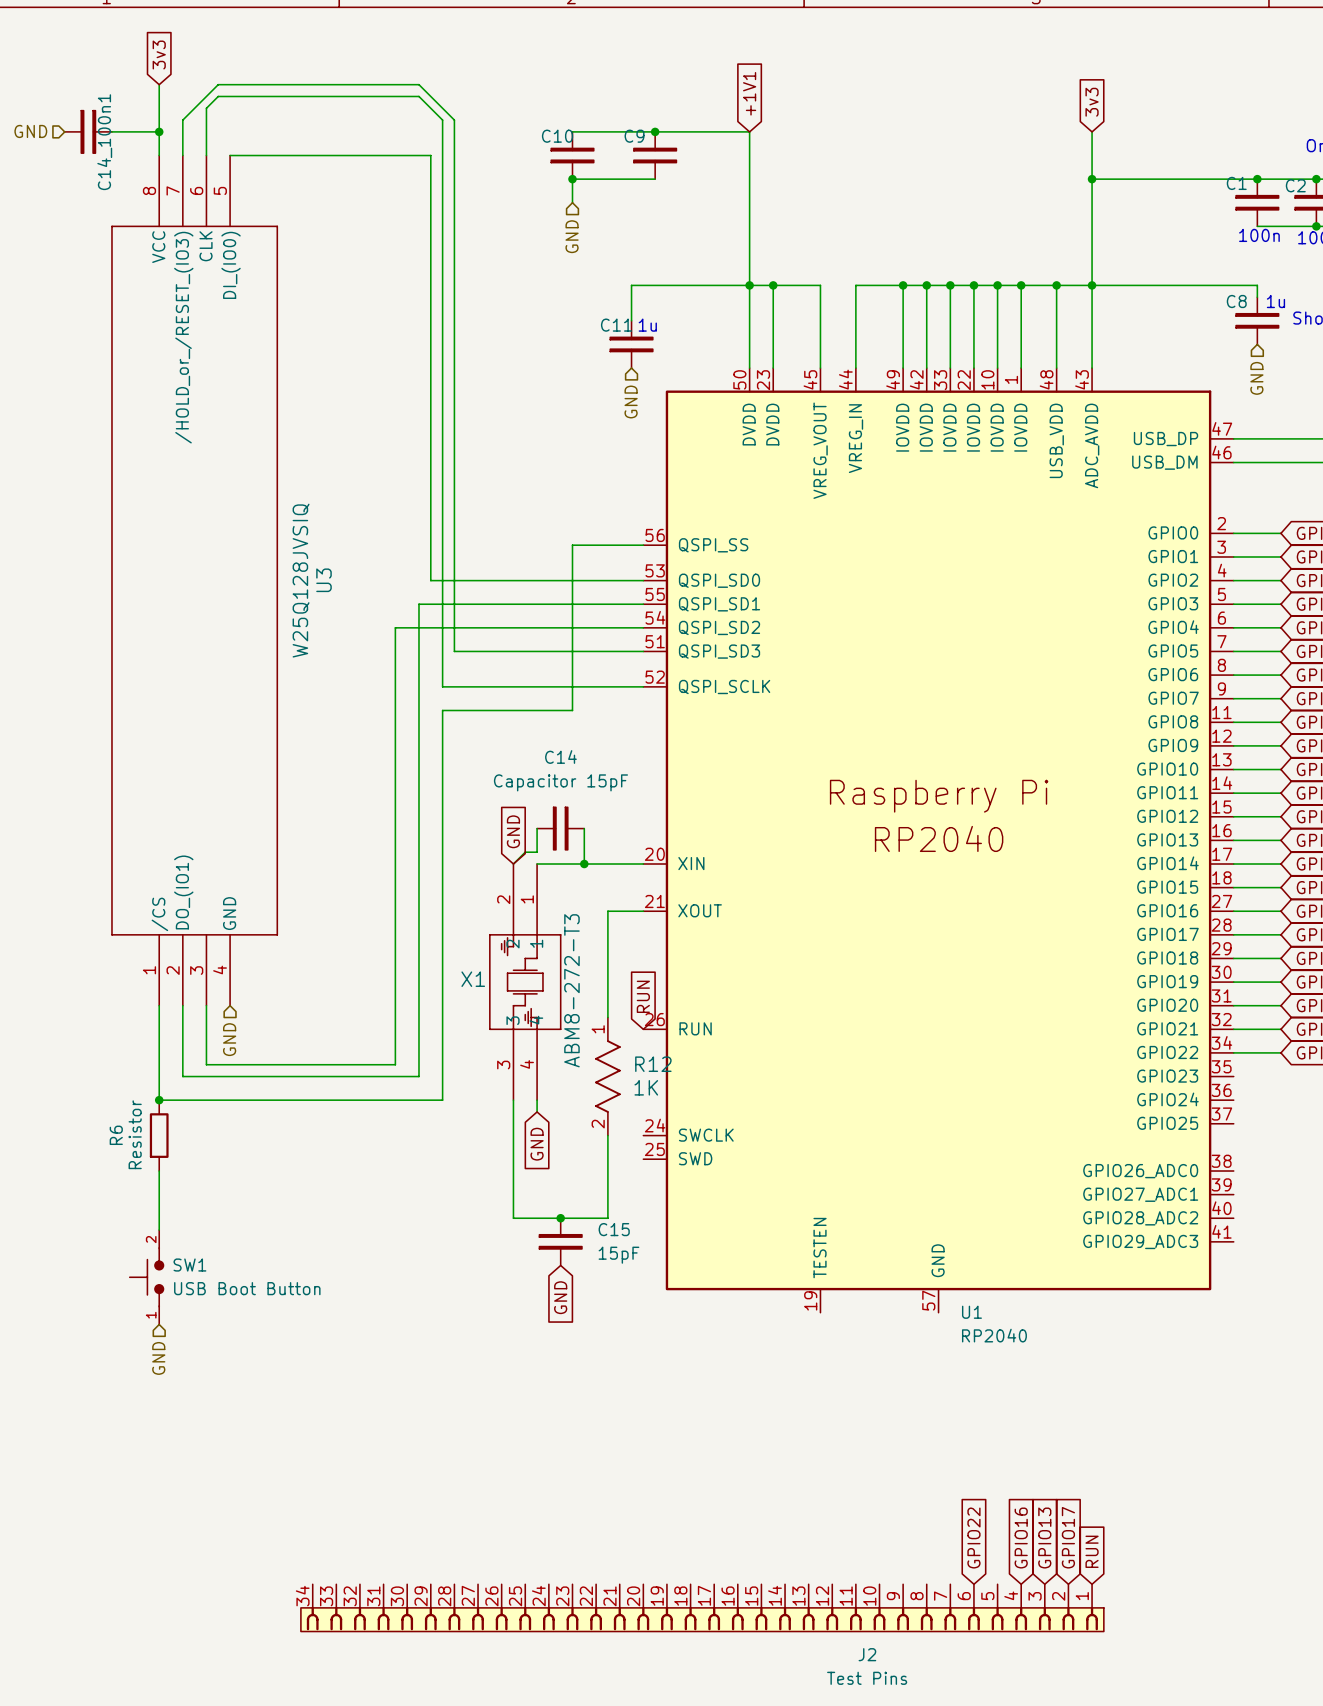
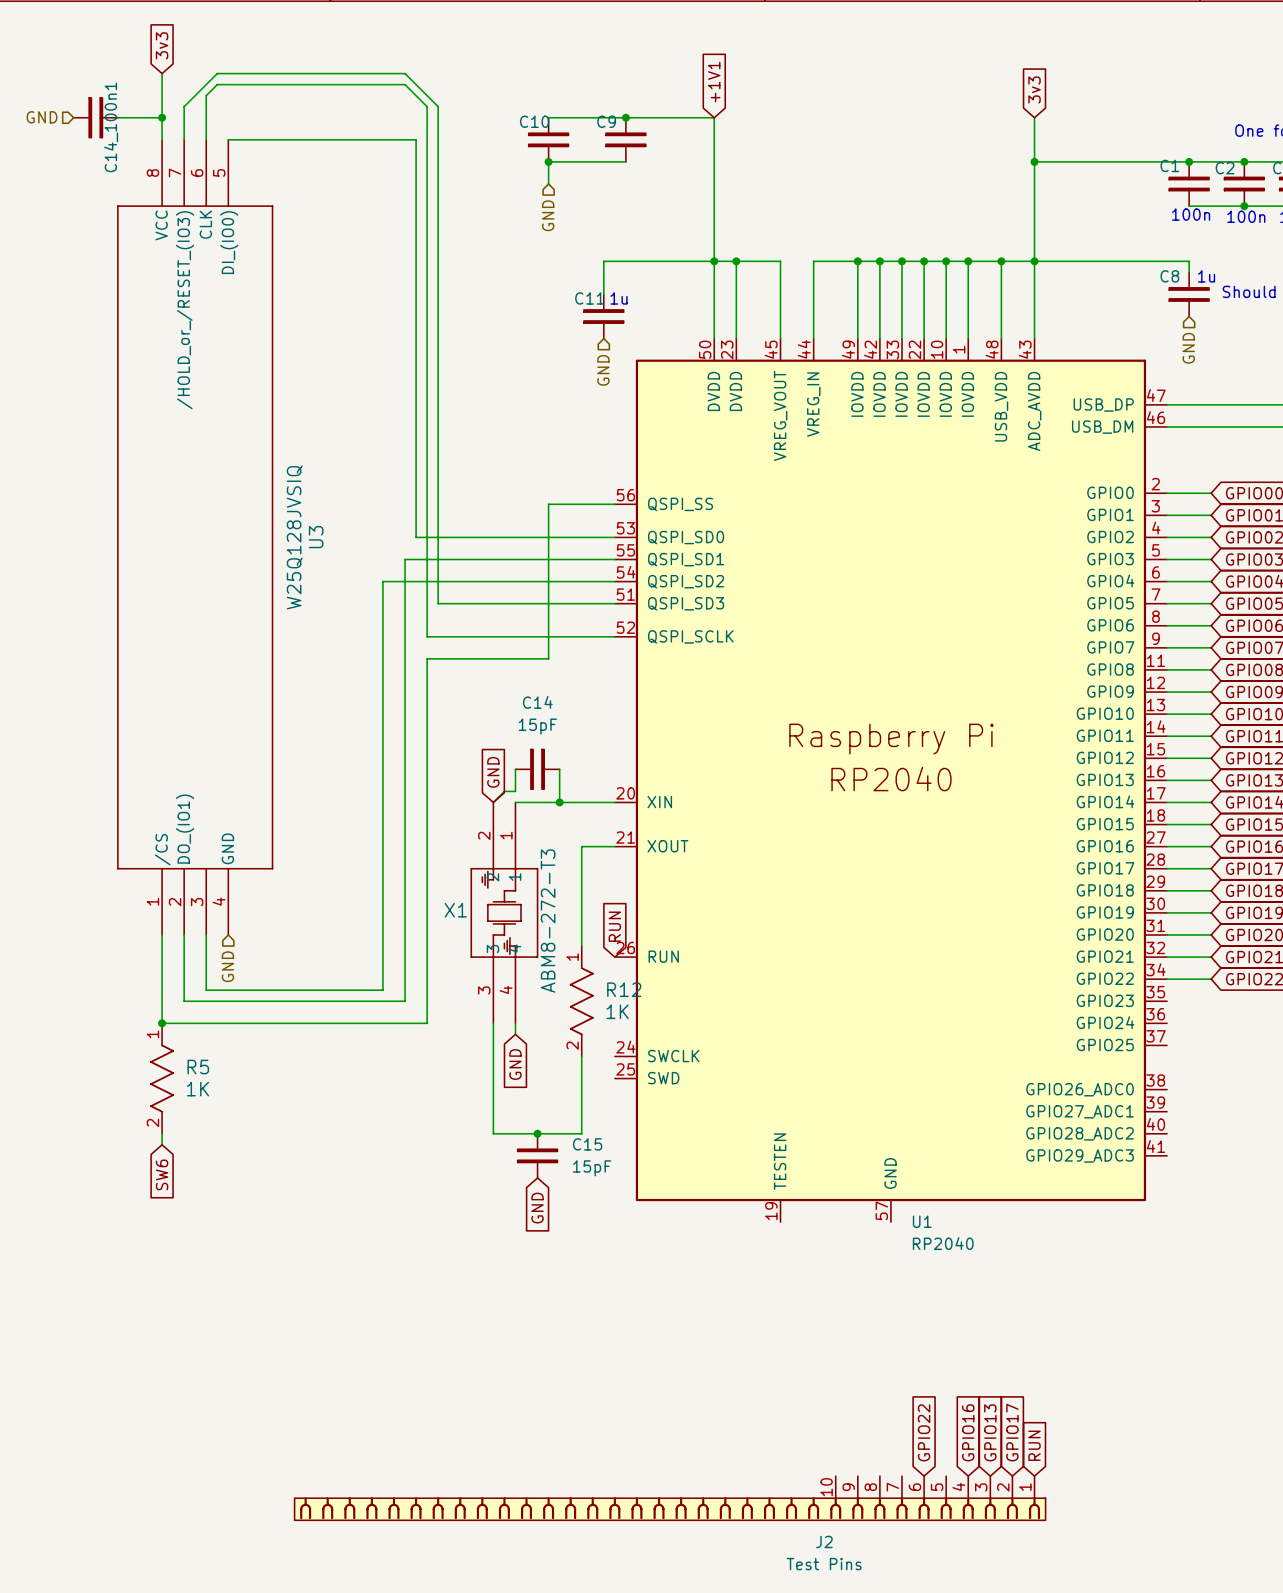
C14 value: Capacitor 15pF (560, 782) -> 15pF (537, 726)
R6: Resistor (159, 1135) -> none
R5: none -> 1K (162, 1078)
global label: none -> SW6 (162, 1174)
SW1: USB Boot Button (146, 1277) -> none
hierarchical label: GND (158, 1358) -> none
J2 symbol: [300, 1584, 1104, 1632] -> [294, 1476, 1046, 1521]

